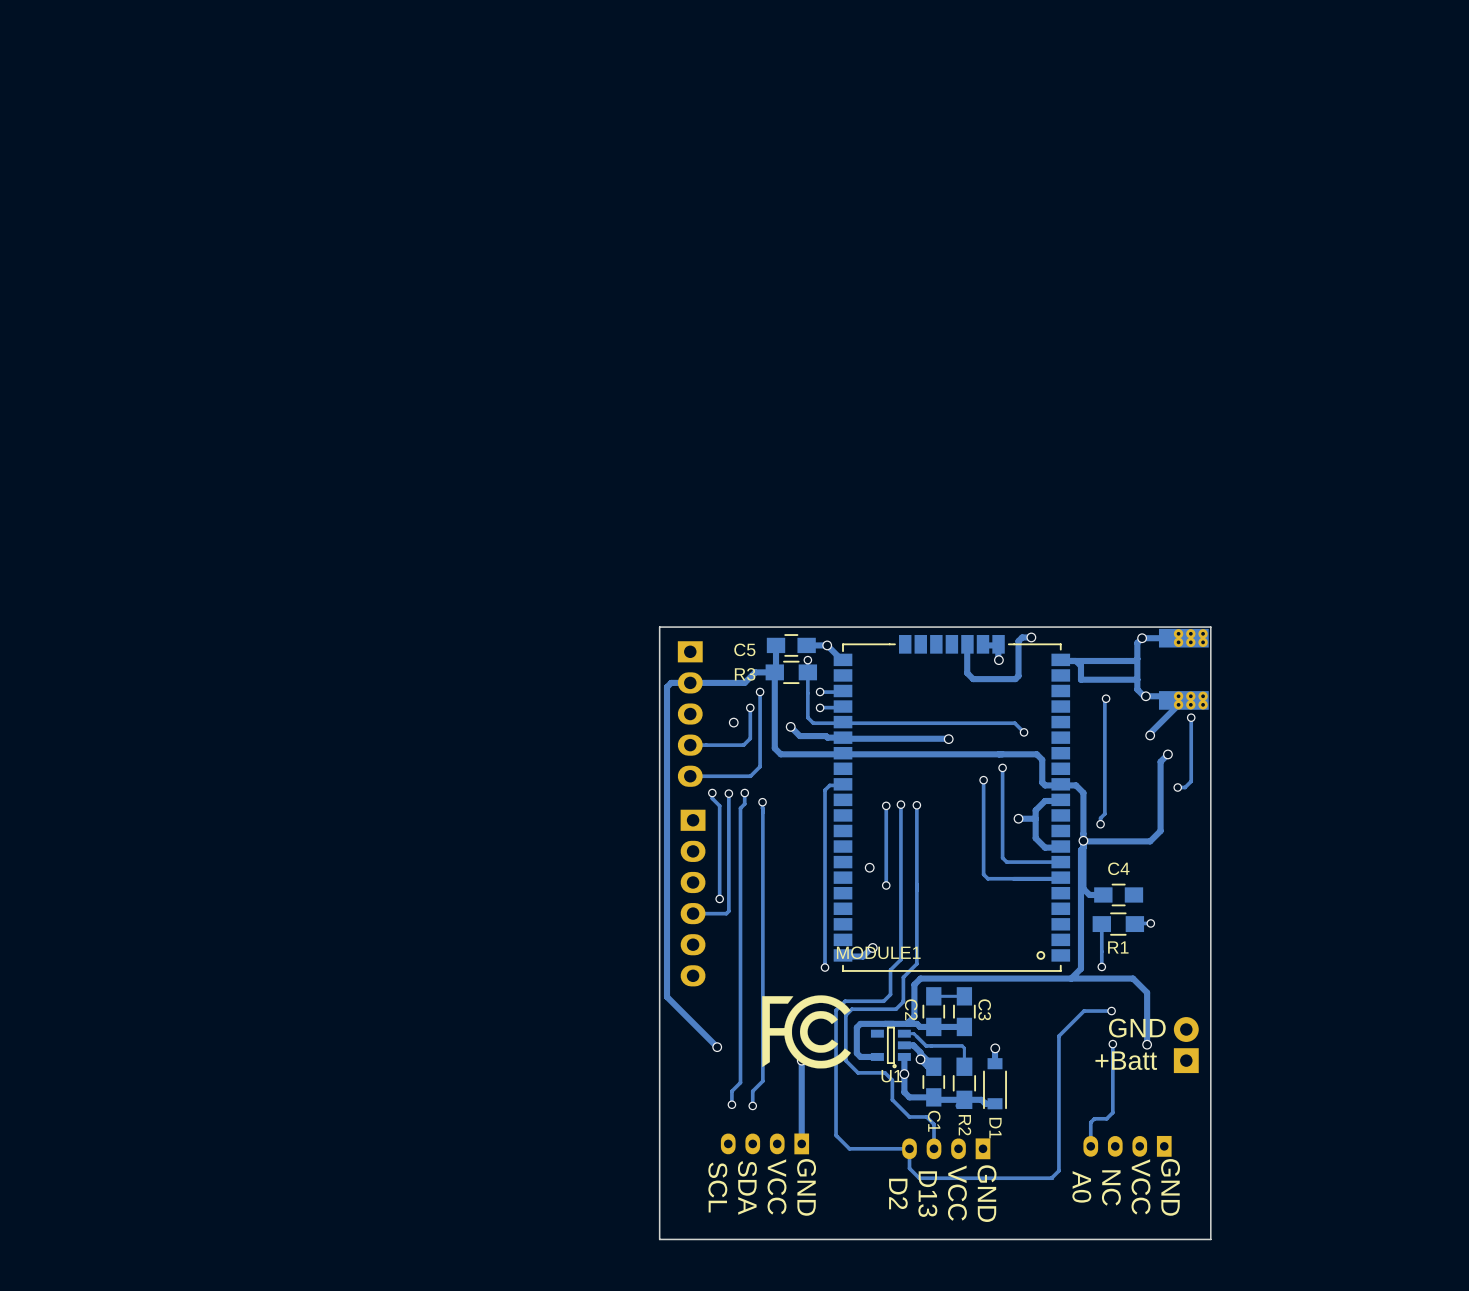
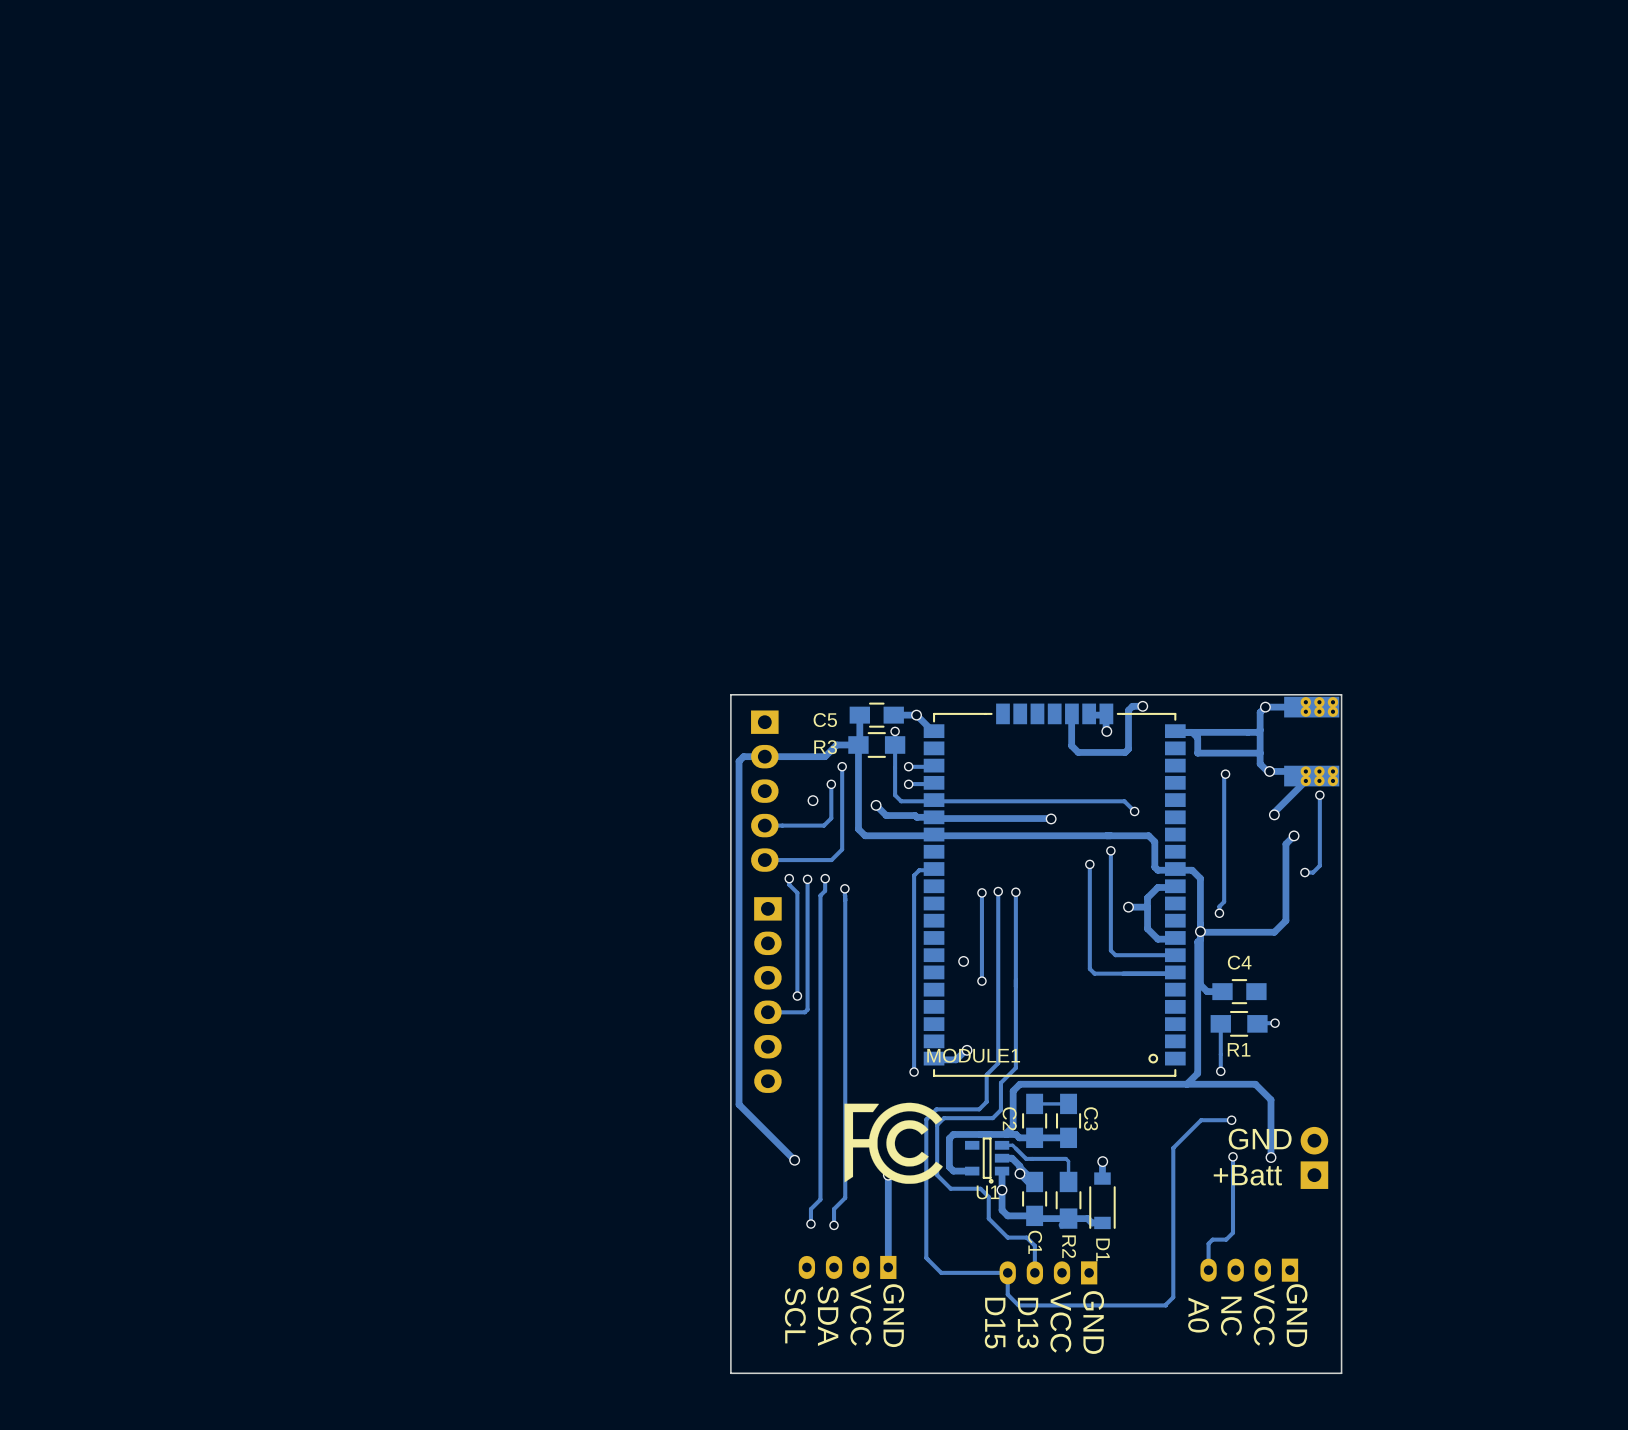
text: D2 (898, 1194) -> D15 (995, 1323)

